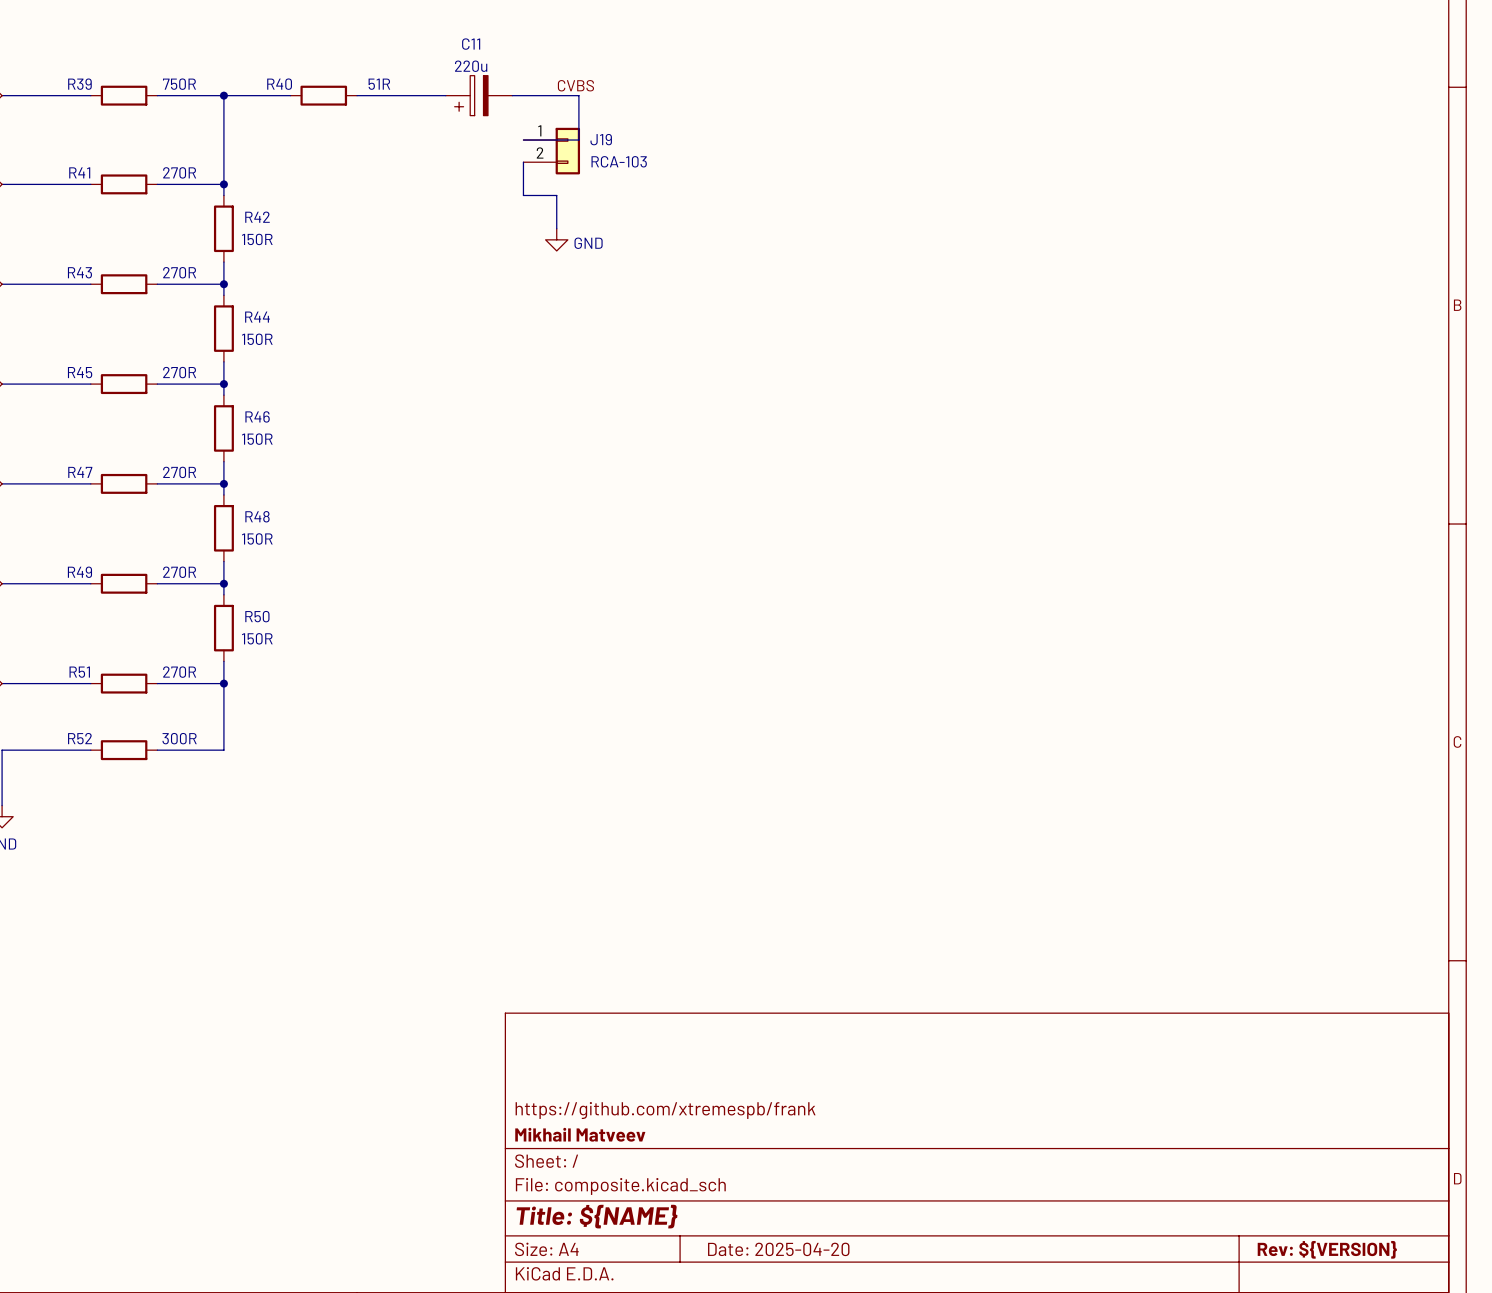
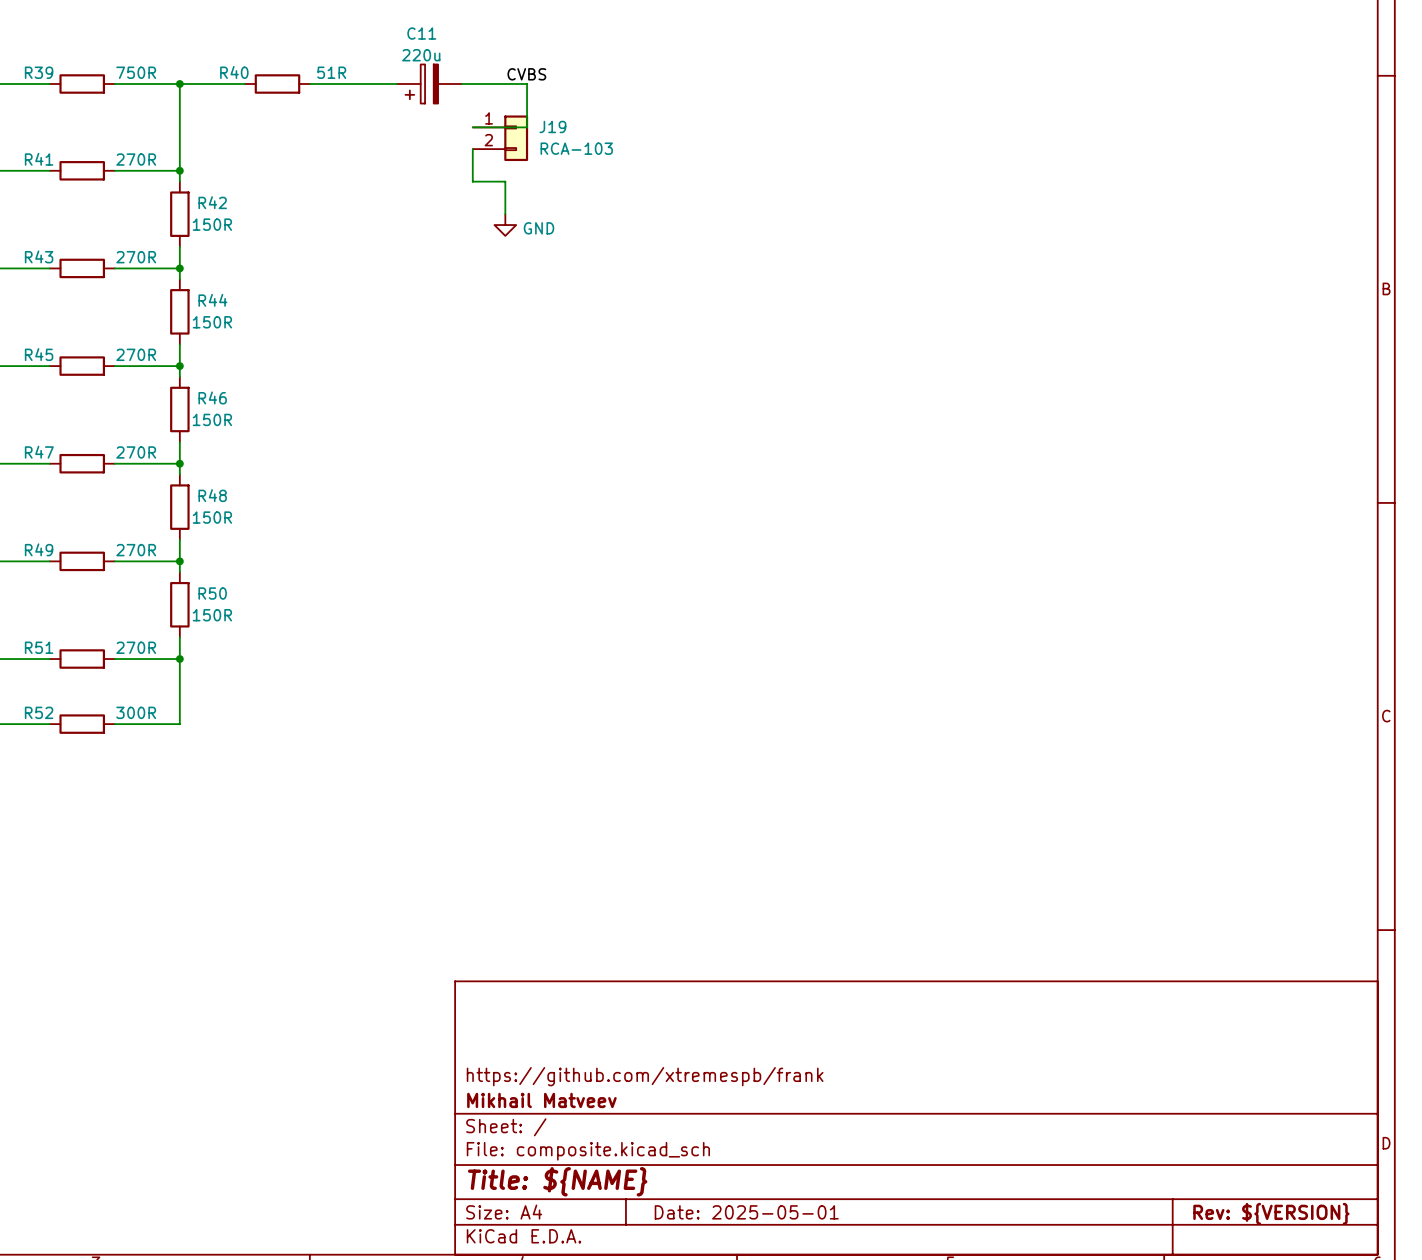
title block: Date: 2025-04-20 (778, 1249) -> Date: 2025-05-01 (746, 1212)

